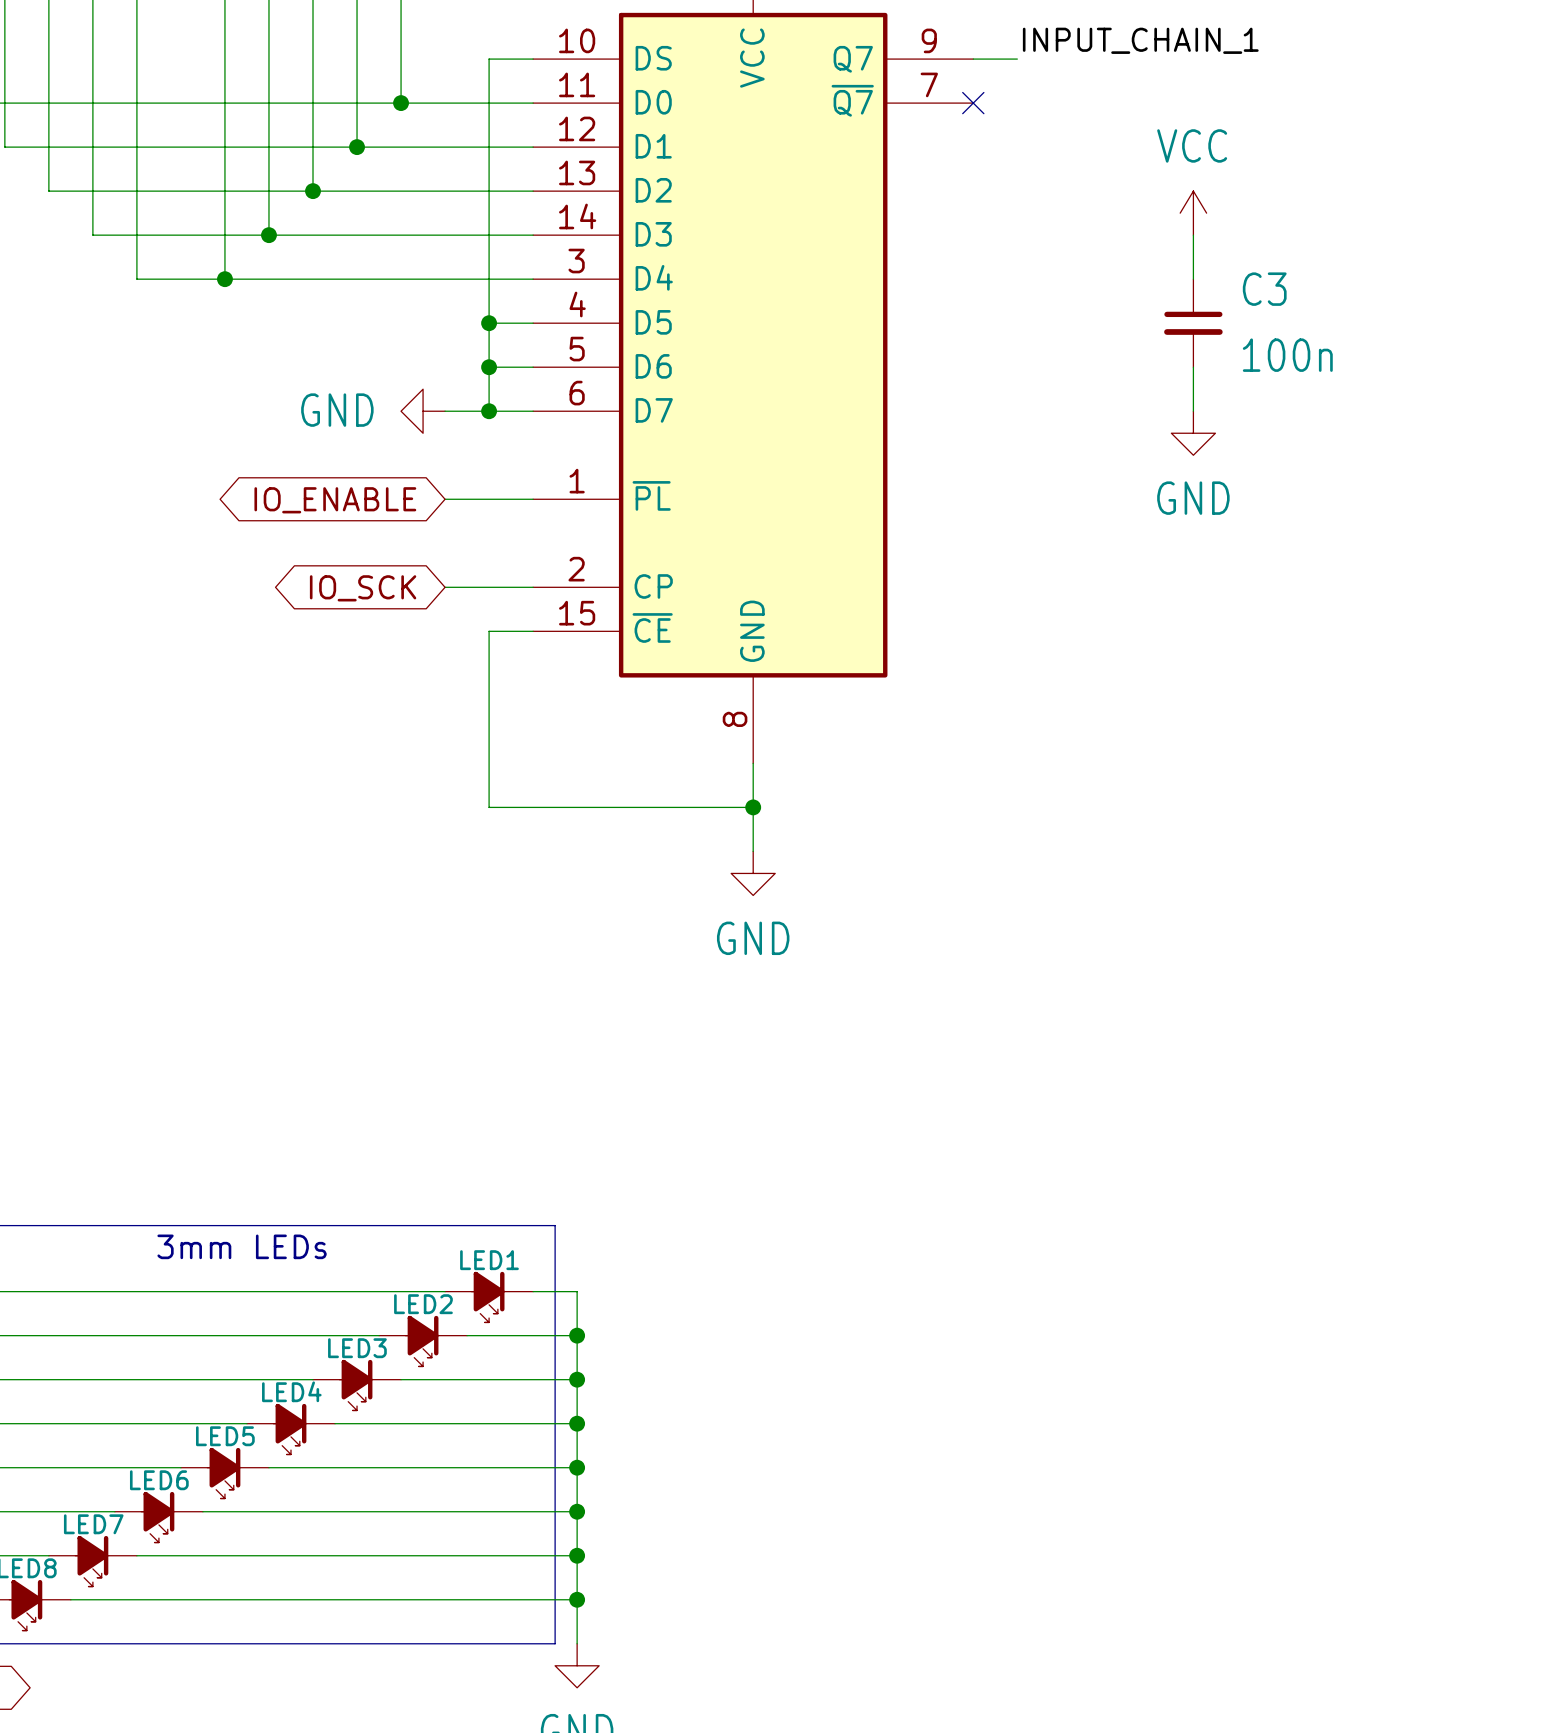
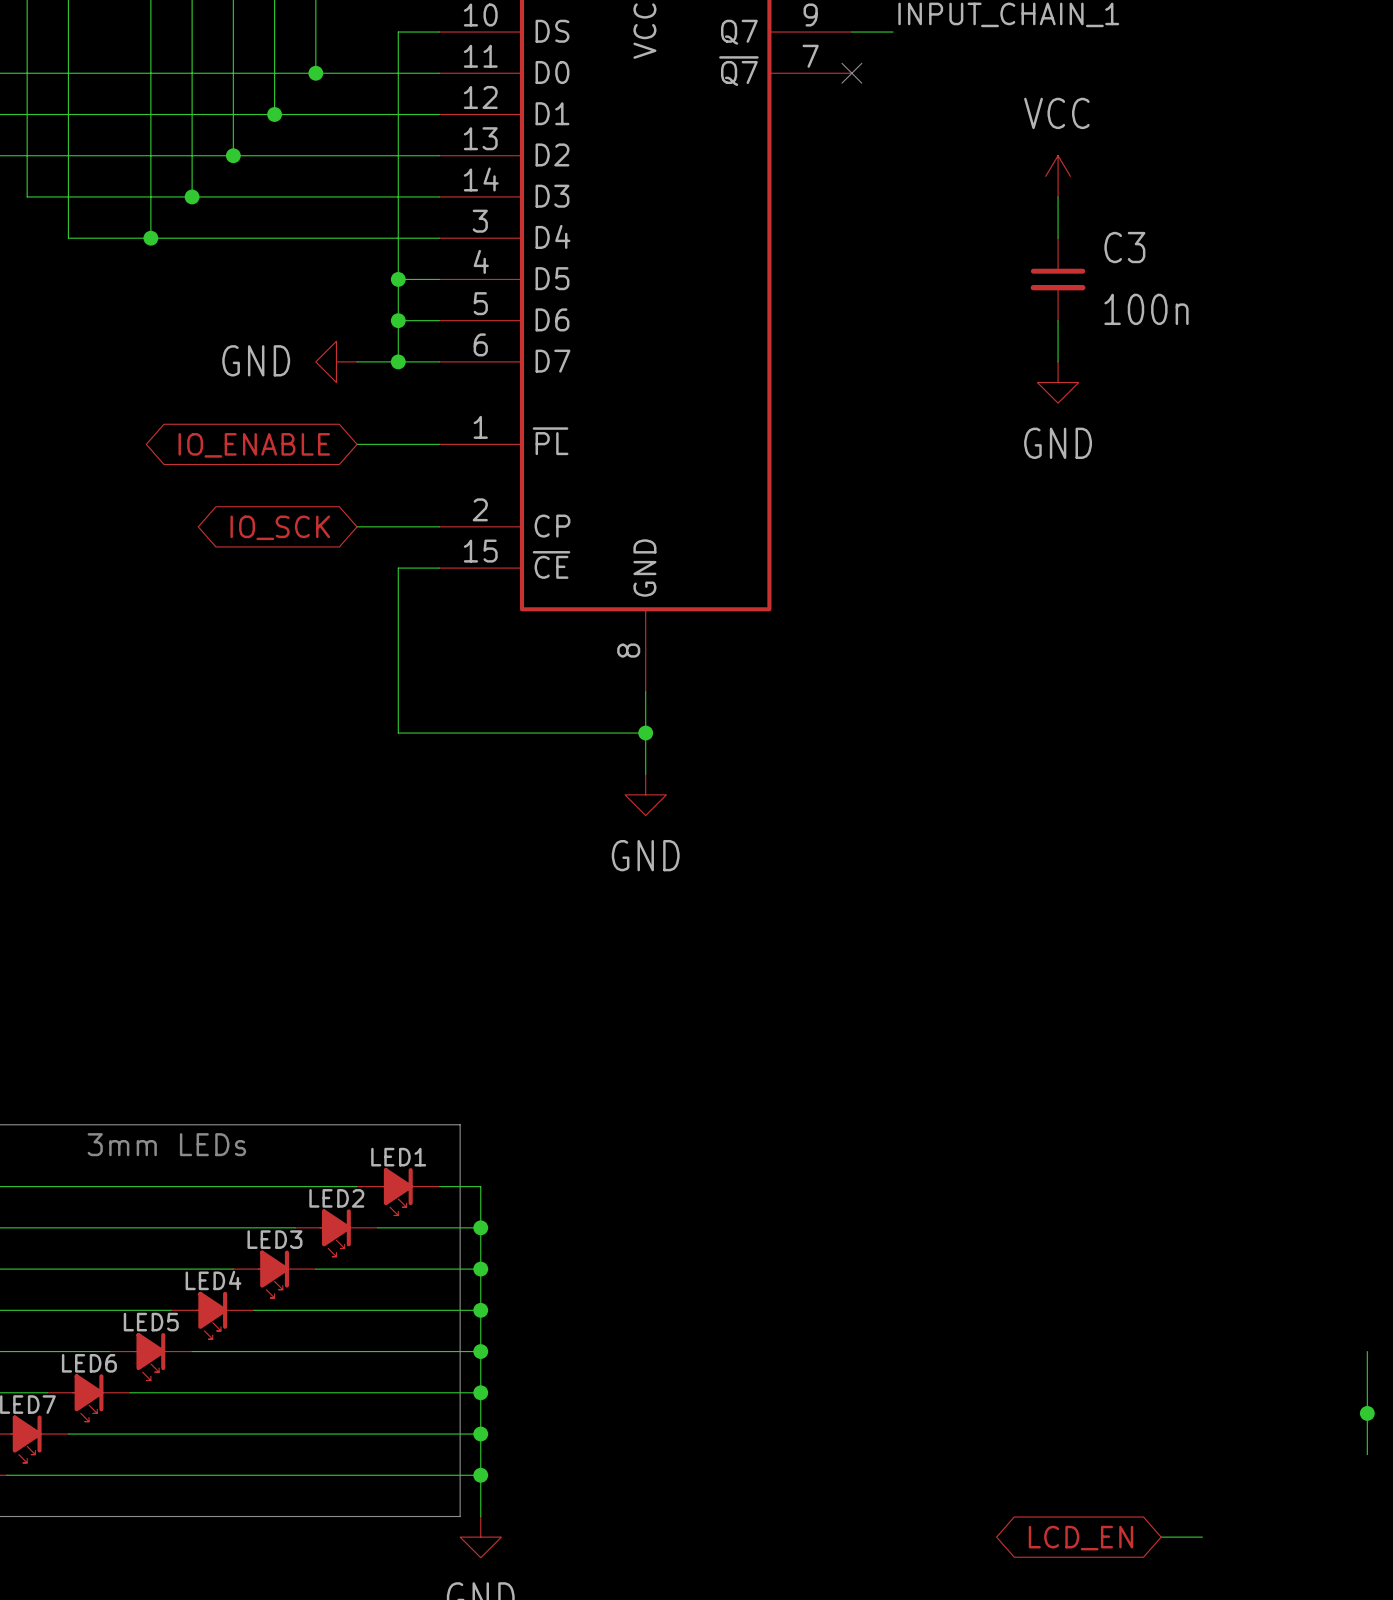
wire: none -> (1367, 1351) (1367, 1454)
junction: none -> (1367, 1413)
wire: none -> (1161, 1537) (1202, 1537)
global label: none -> LCD_EN (1080, 1538)

